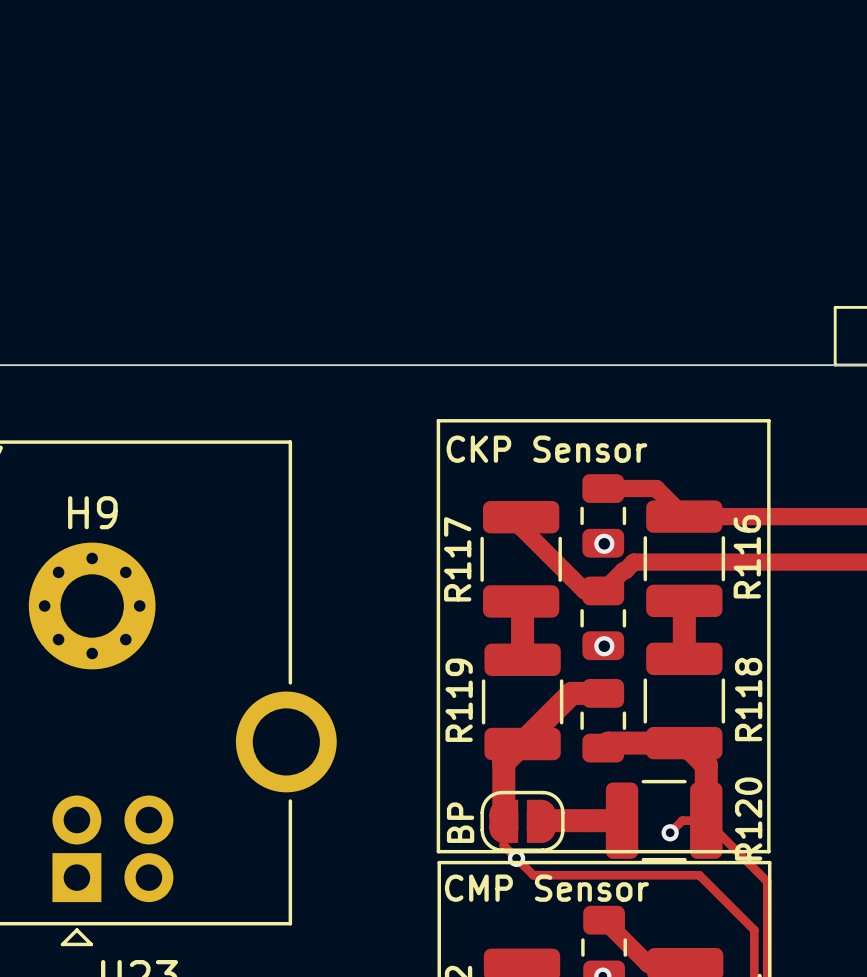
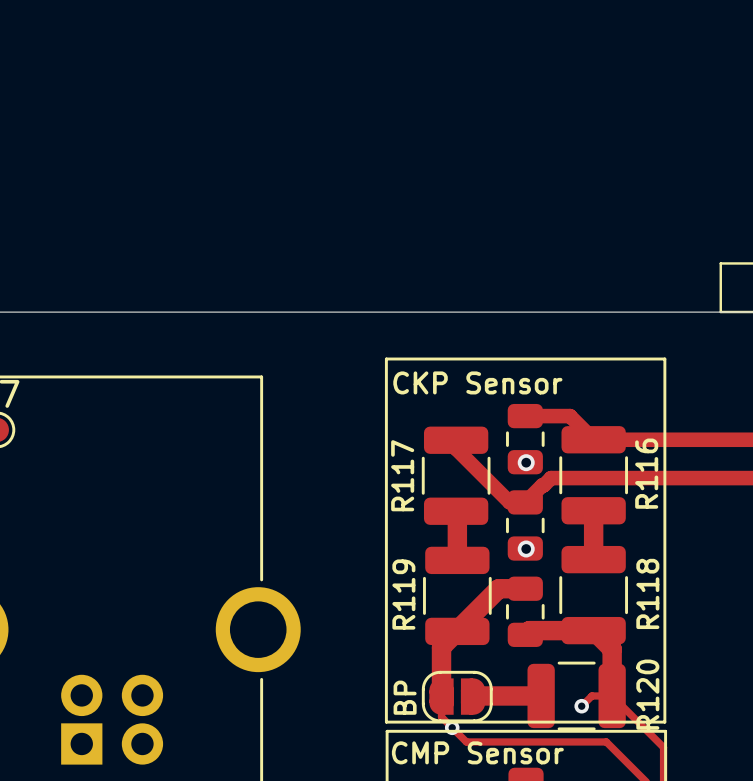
H9: (92, 605) -> none

